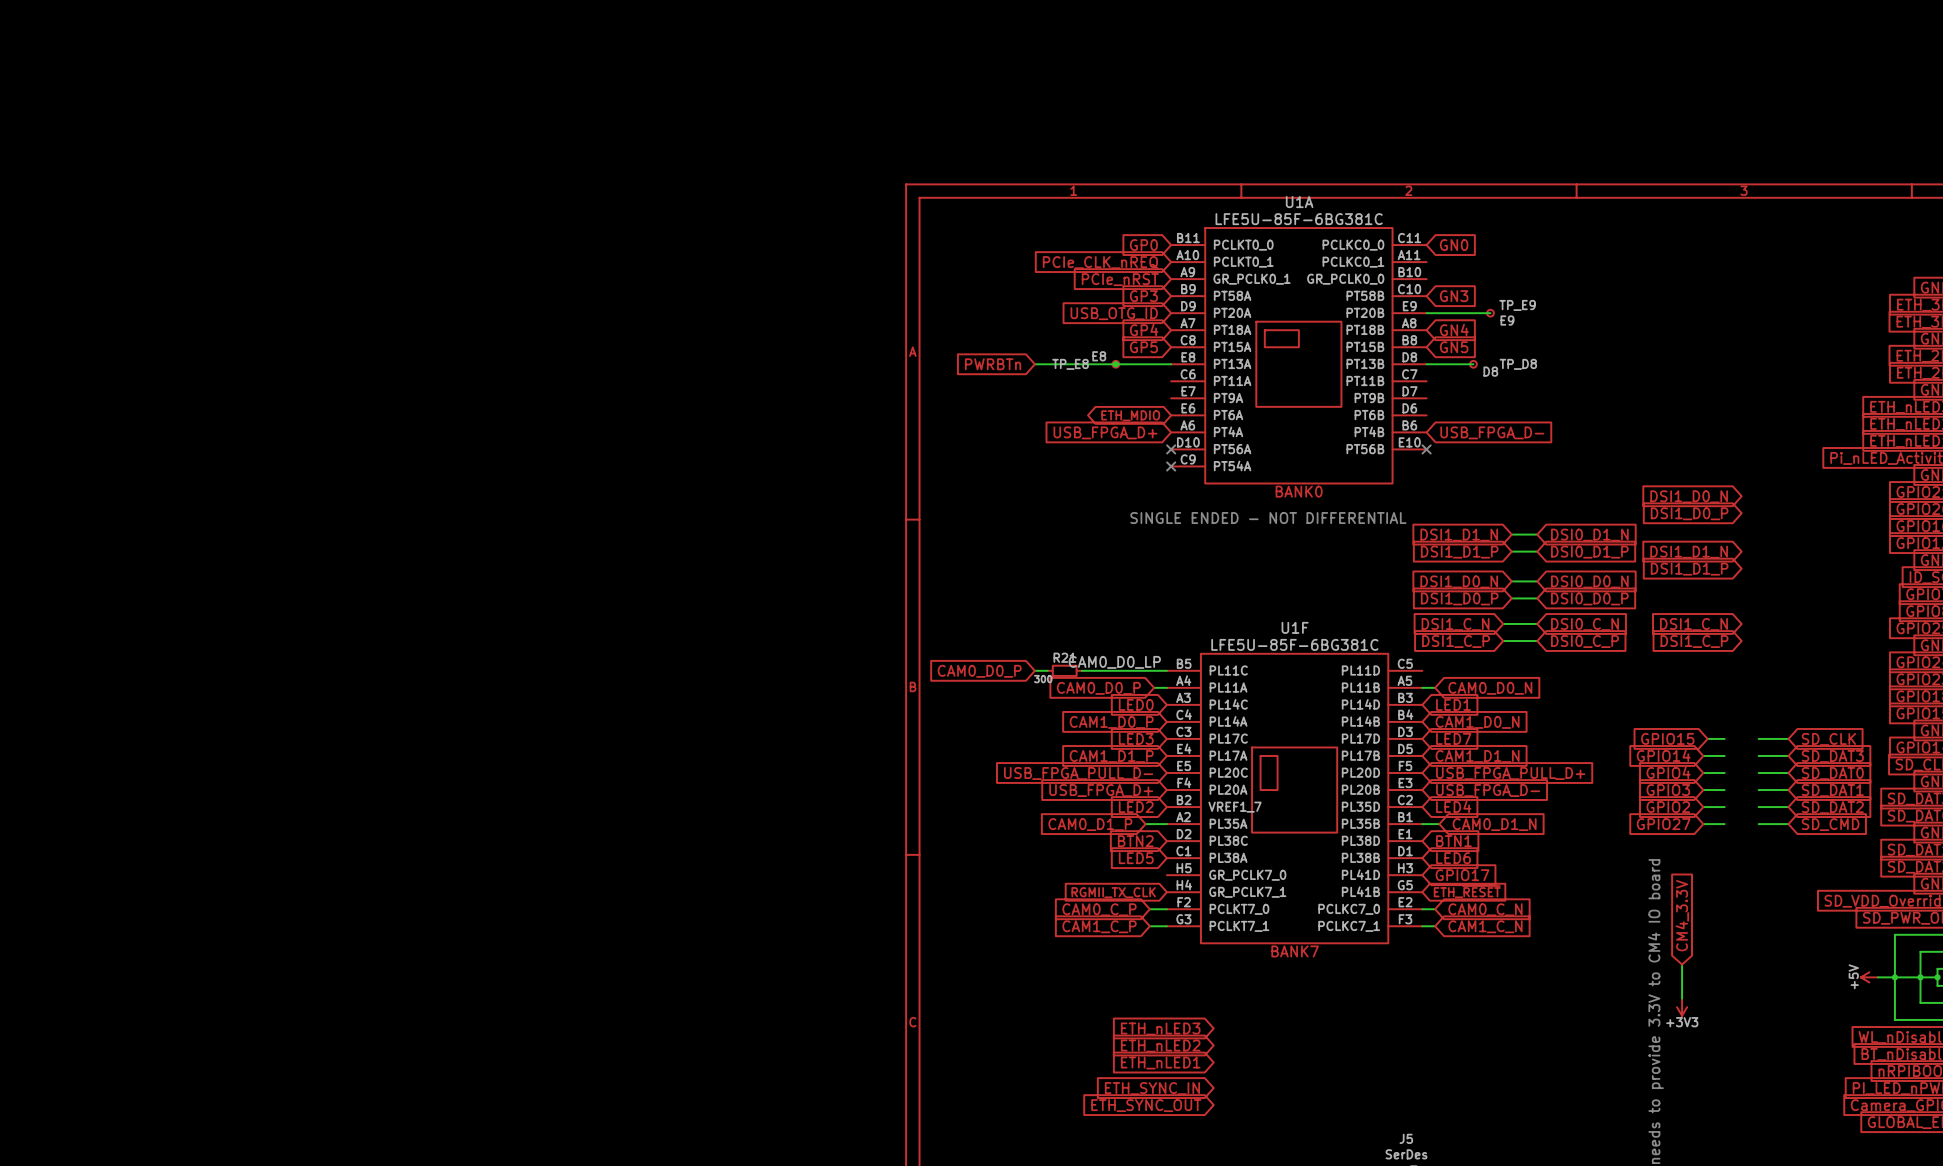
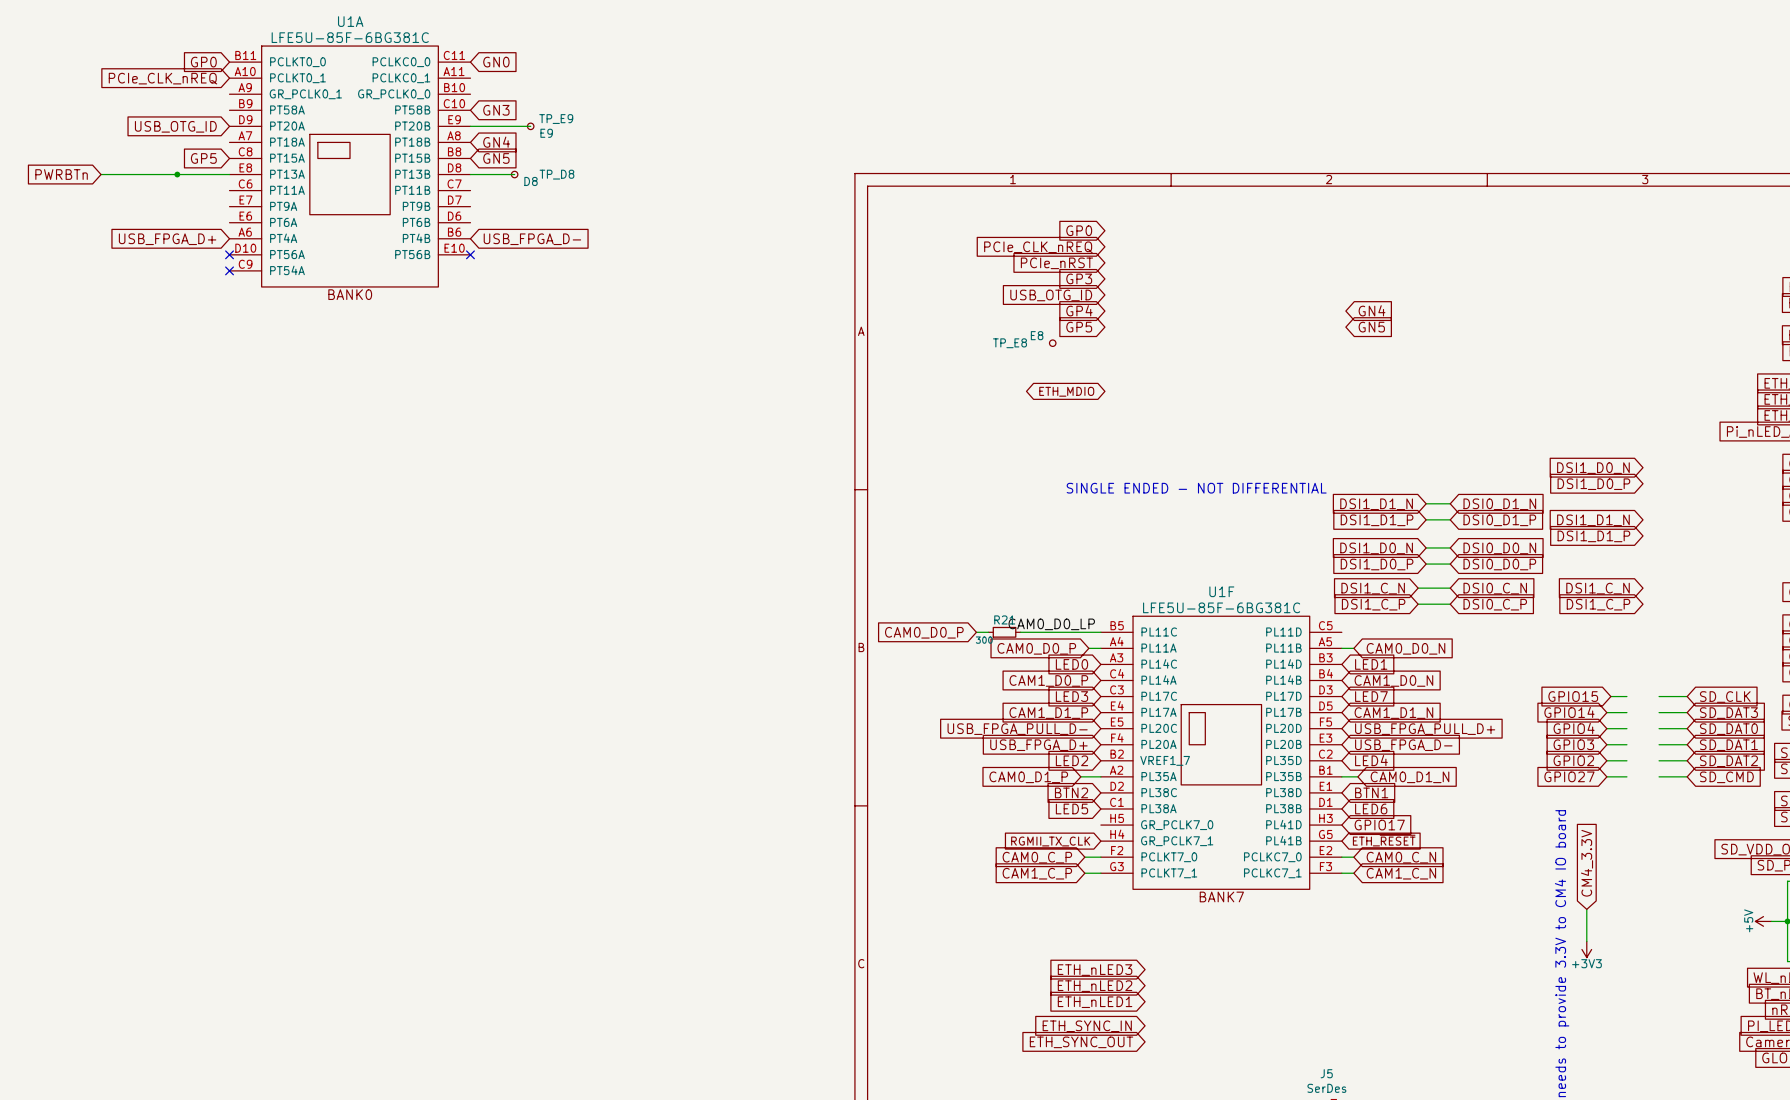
global label: none -> GP0 (203, 62)
global label: none -> GN0 (496, 62)
global label: none -> PCIe_CLK_nREQ (162, 78)
global label: none -> GN3 (496, 110)
global label: none -> USB_OTG_ID (175, 126)
wire: none -> (470, 126) (530, 126)
global label: none -> GN4 (496, 142)
global label: none -> GP5 (203, 158)
global label: none -> GN5 (496, 158)
global label: none -> PWRBTn (61, 174)
wire: none -> (101, 174) (229, 174)
junction: none -> (177, 174)
wire: none -> (470, 174) (514, 174)
global label: GN0 (1454, 245) -> none
global label: none -> USB_FPGA_D+ (167, 239)
global label: none -> USB_FPGA_D- (532, 239)
no-connect mark: none -> (229, 254)
no-connect mark: none -> (470, 254)
no-connect mark: none -> (229, 270)
global label: GN3 (1454, 296) -> none
wire: (1426, 313) (1490, 313) -> none
TP_E9 position: (1490, 313) -> (530, 126)
U1A position: (1298, 355) -> (350, 166)
global label: PWRBTn (993, 364) -> none
wire: (1034, 364) (1171, 364) -> none
junction: (1115, 364) -> none
wire: (1426, 364) (1473, 364) -> none
TP_D8 position: (1473, 364) -> (514, 174)
global label: USB_FPGA_D+ (1105, 432) -> none
global label: USB_FPGA_D- (1492, 432) -> none
no-connect mark: (1171, 449) -> none
no-connect mark: (1426, 449) -> none
no-connect mark: (1171, 466) -> none

